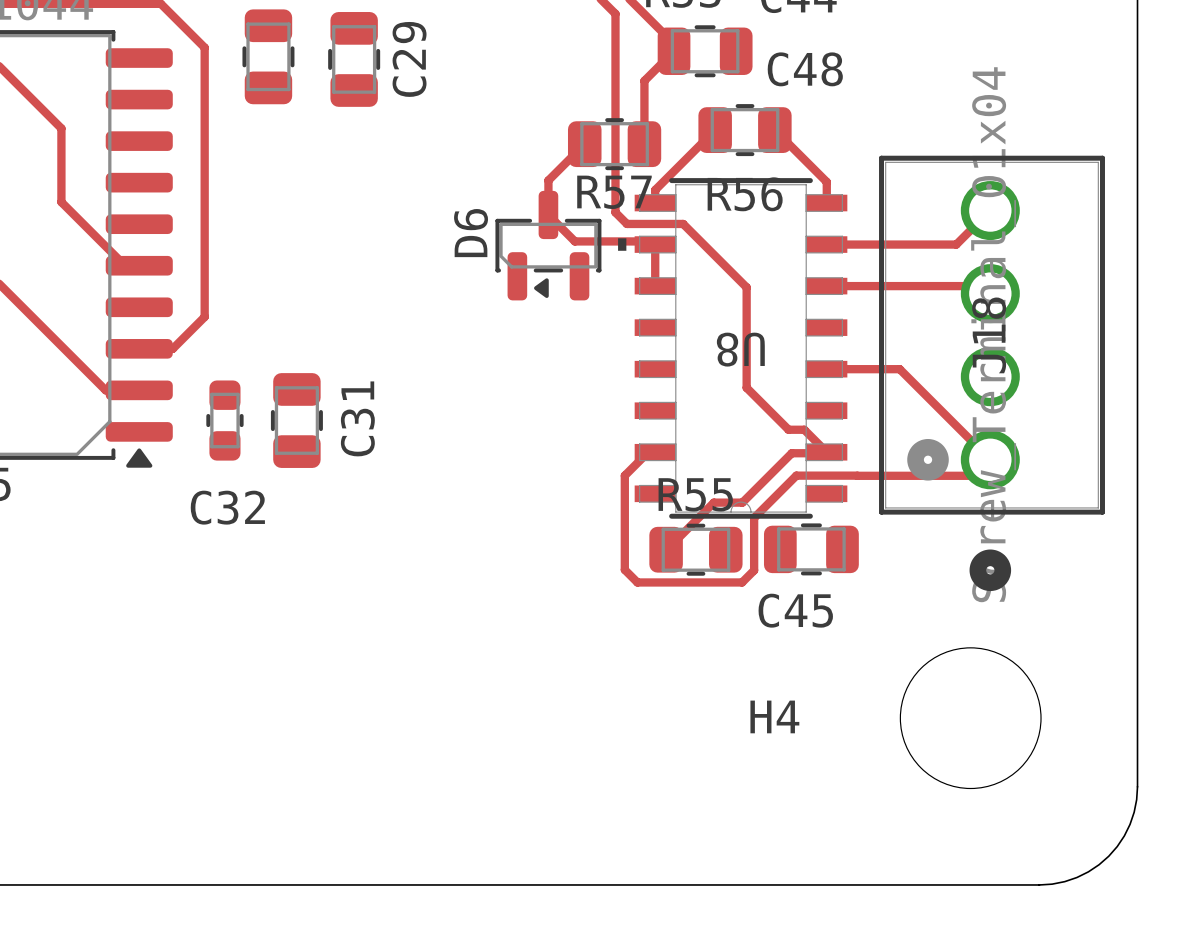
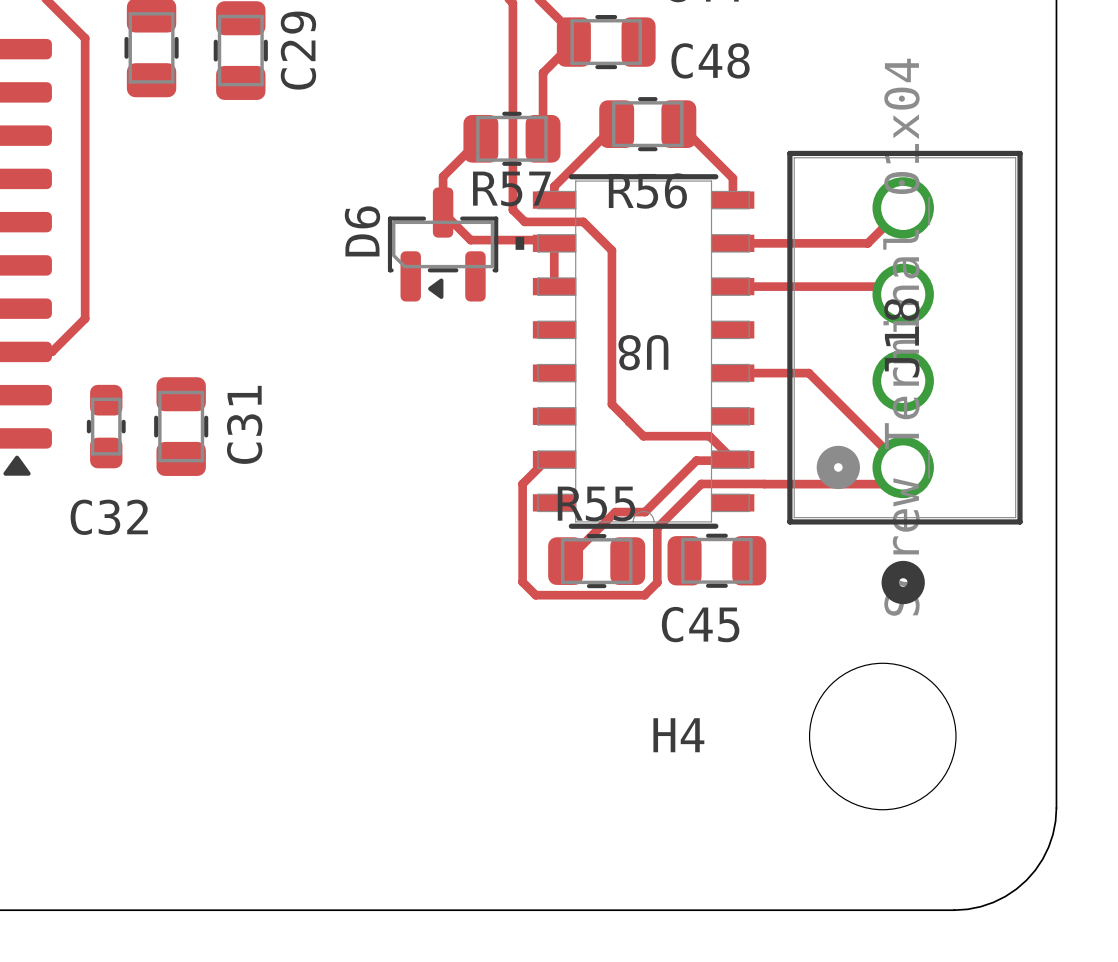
top track: (710, 251) (746, 287) (746, 387) (788, 429) -> (611, 250) (611, 404) (629, 421)
top track: none -> (629, 422) (643, 436) (693, 436)

